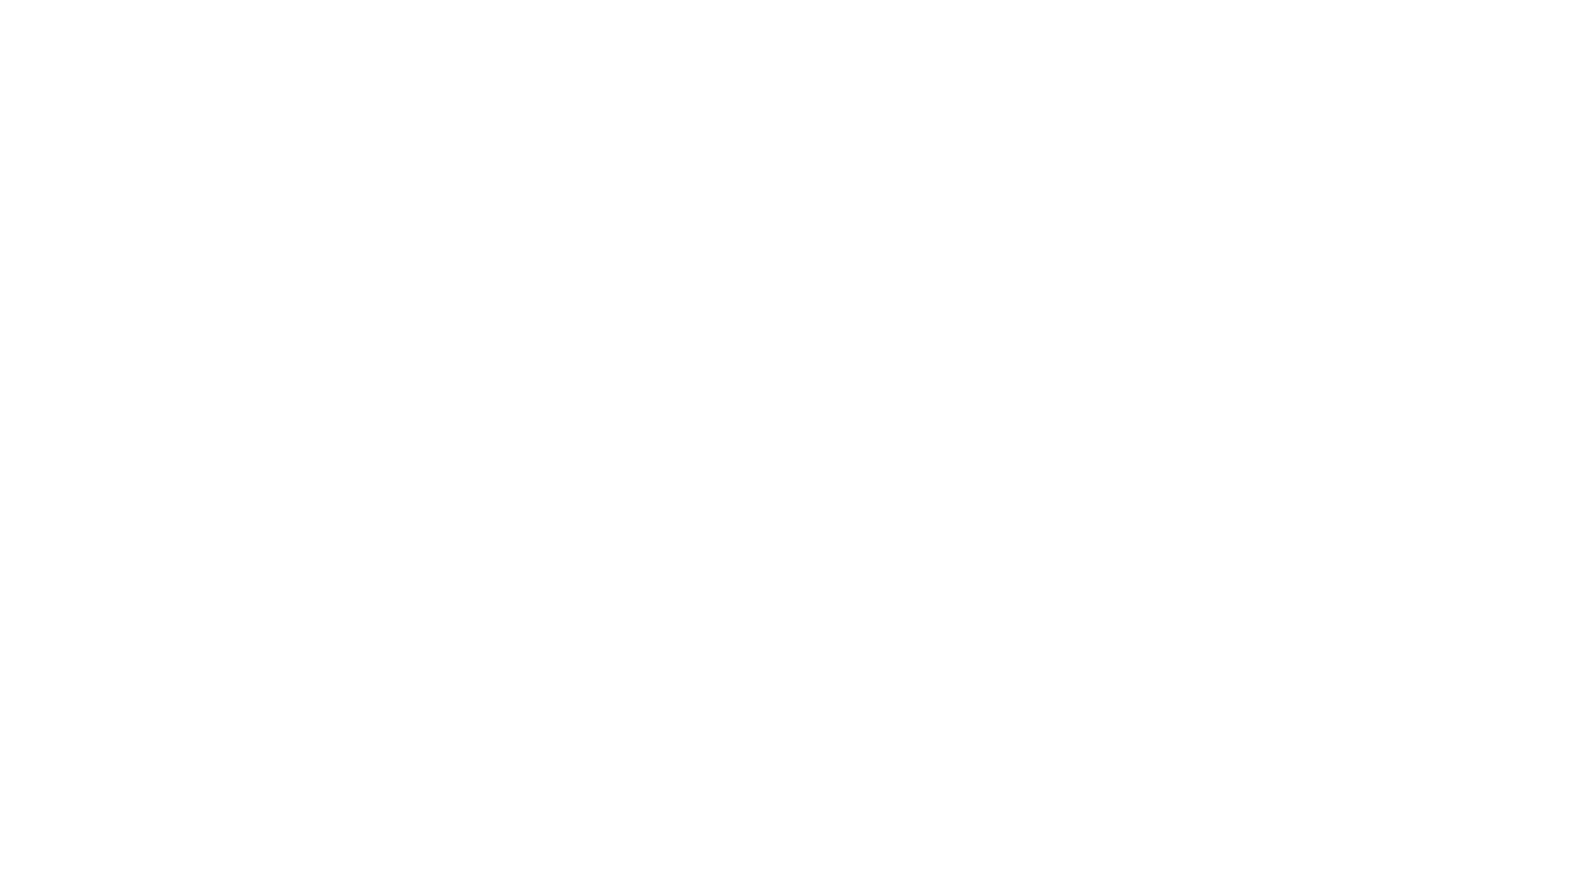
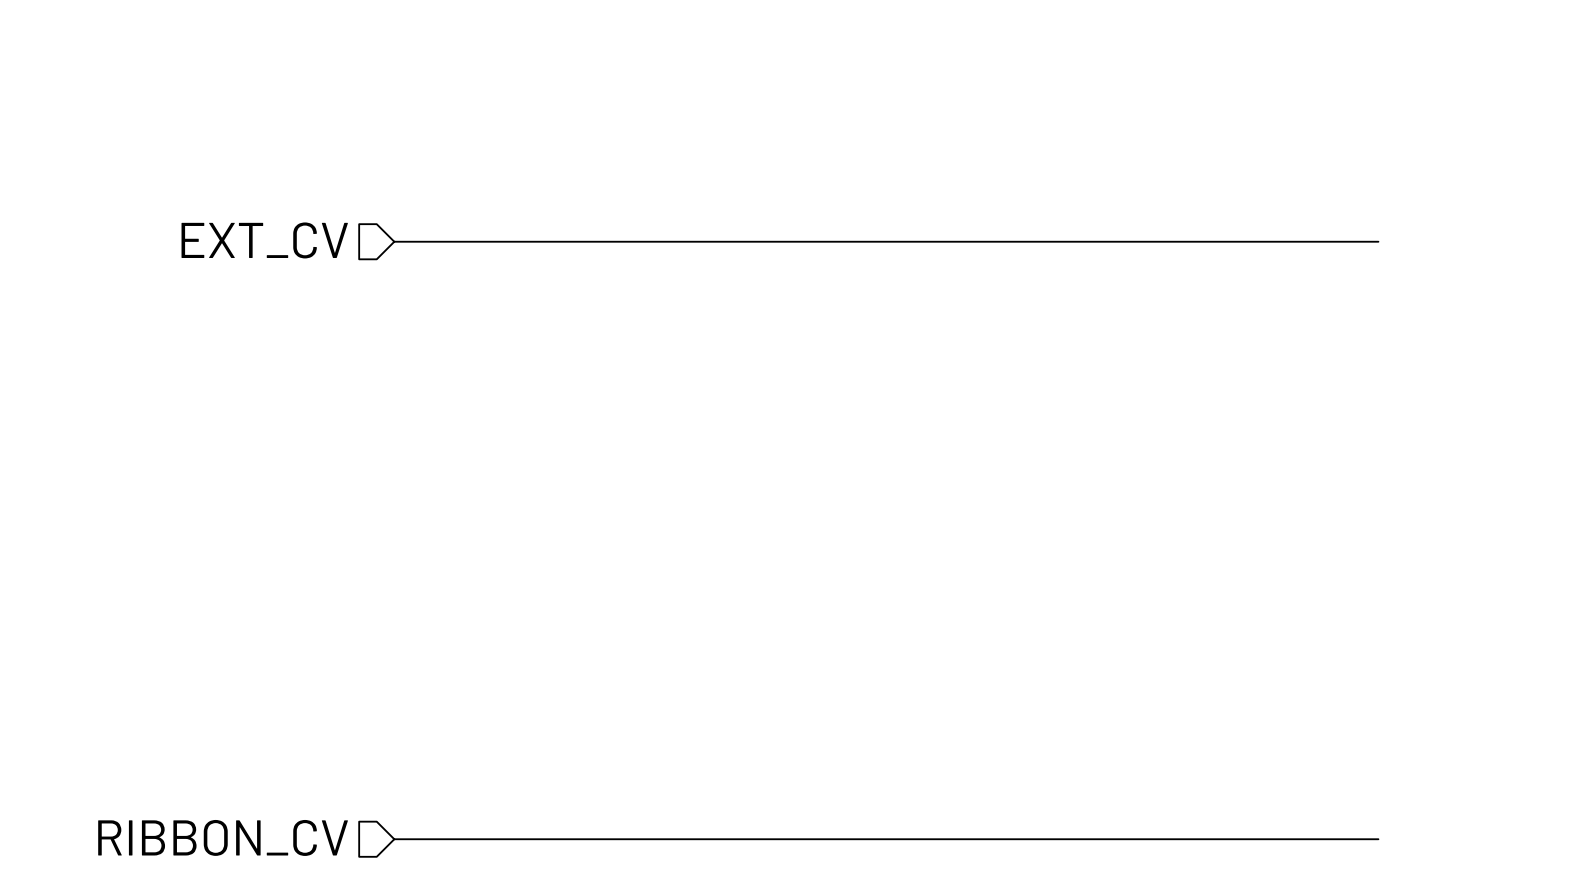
hierarchical label: none -> EXT_CV (264, 240)
wire: none -> (394, 241) (1378, 241)
hierarchical label: none -> RIBBON_CV (223, 837)
wire: none -> (394, 839) (1378, 839)

